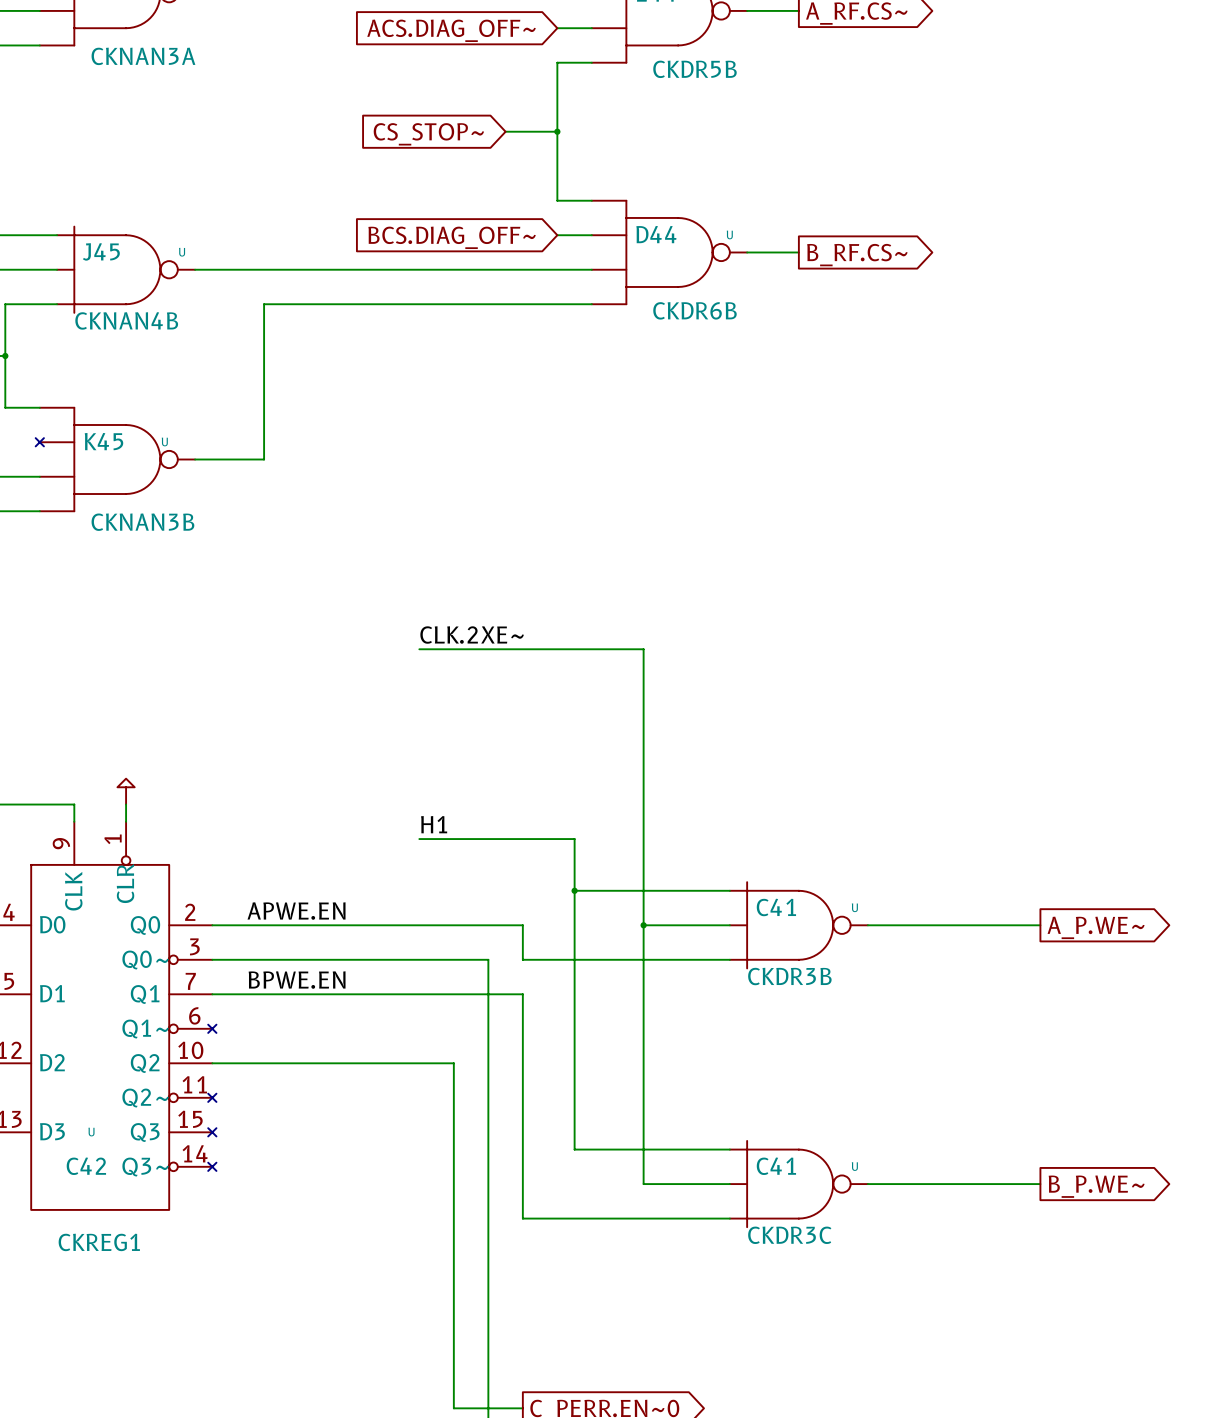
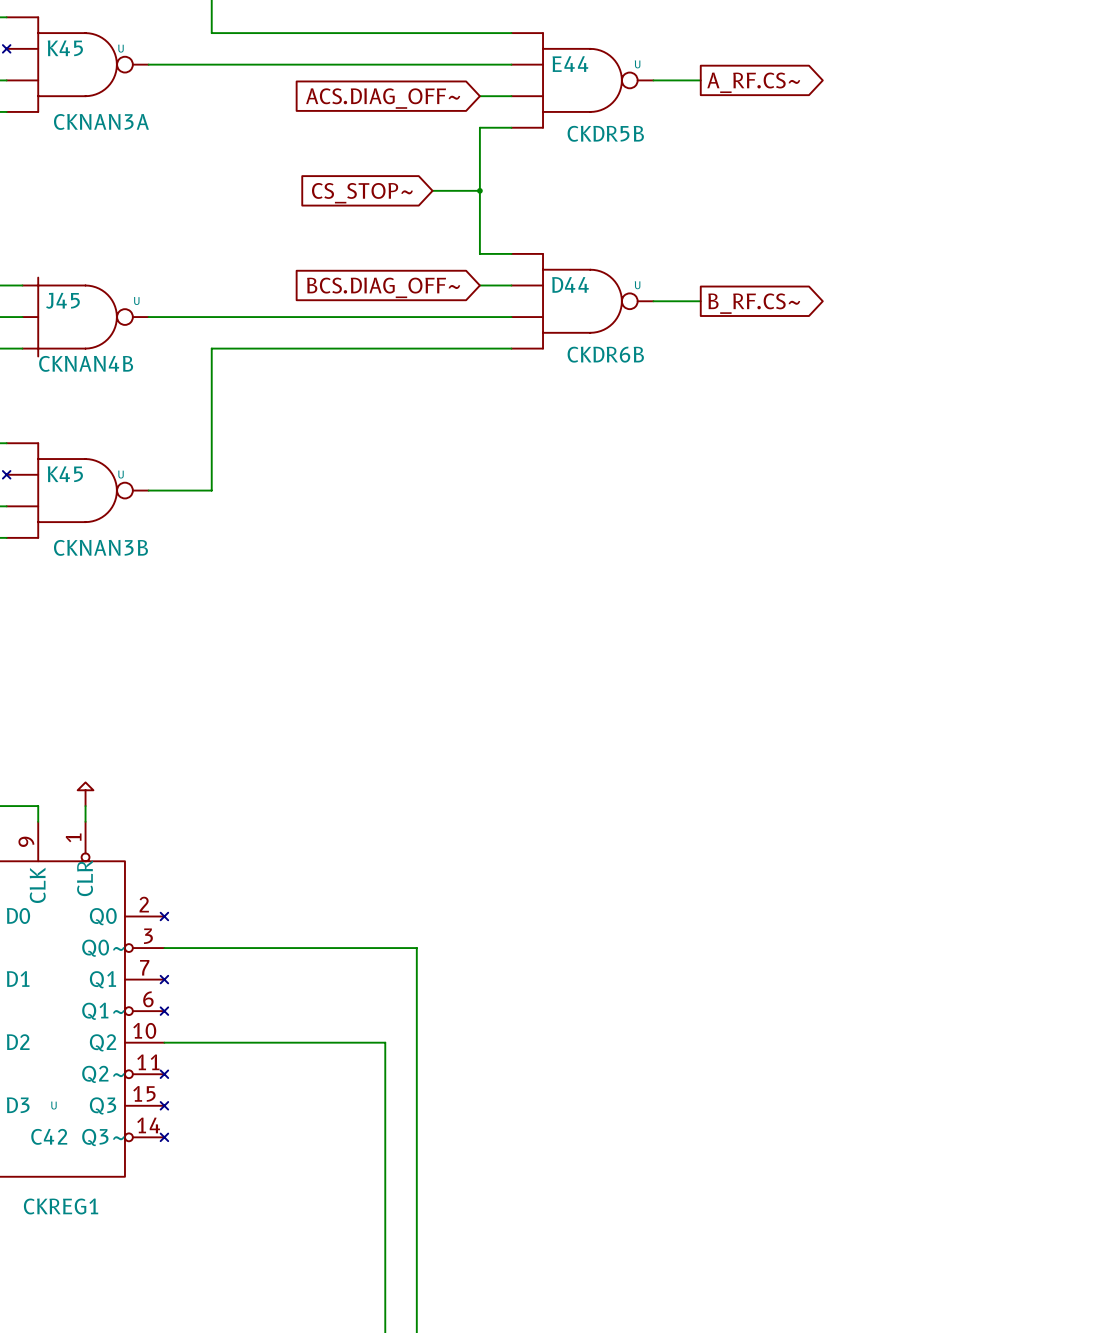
label: CLK.2XE~ (472, 635) -> none
wire: (419, 649) (643, 649) (643, 1184) (729, 1184) -> none
label: H1 (434, 824) -> none
wire: (419, 839) (574, 839) (574, 1149) (729, 1149) -> none
wire: (574, 890) (729, 890) -> none
junction: (574, 890) -> none
label: APWE.EN (296, 911) -> none
wire: (212, 925) (522, 925) (522, 959) (729, 959) -> none
no-connect mark: none -> (164, 916)
wire: (643, 925) (729, 925) -> none
junction: (643, 925) -> none
U: (798, 925) -> none
wire: (867, 925) (1040, 925) -> none
global label: A_P.WE~ (1096, 927) -> none
label: BPWE.EN (297, 980) -> none
wire: (212, 994) (522, 994) (522, 1218) (729, 1218) -> none
no-connect mark: none -> (164, 979)
U: (798, 1184) -> none
wire: (867, 1184) (1040, 1184) -> none
global label: B_P.WE~ (1096, 1186) -> none

